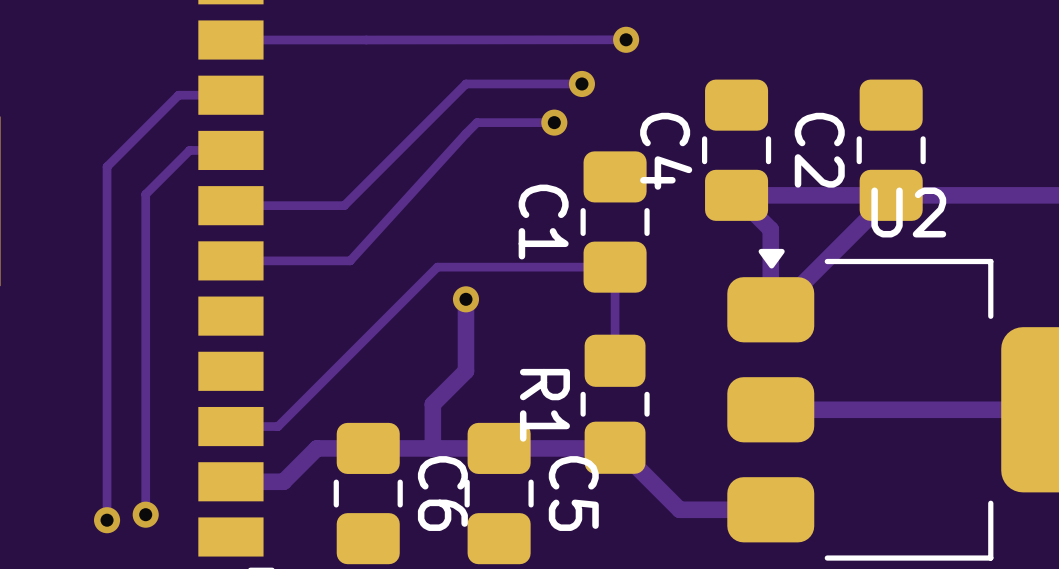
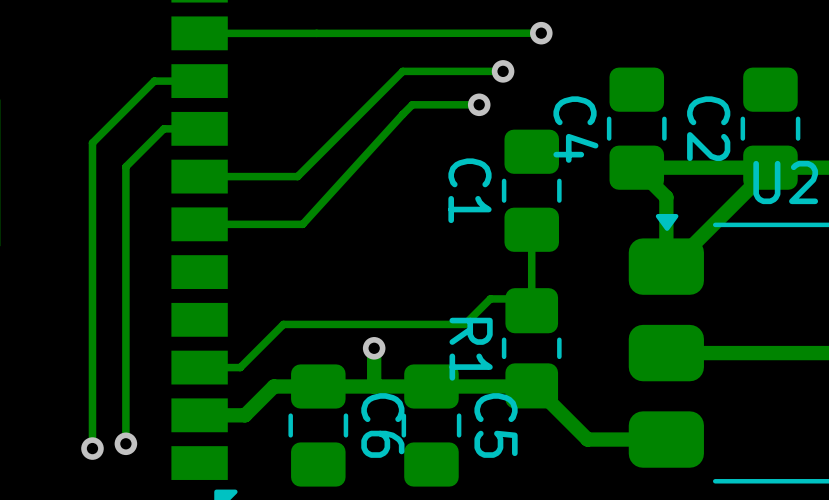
track: (615, 267) (437, 267) (327, 376) -> (519, 298) (490, 298) (464, 324) (283, 324)
track: (465, 299) (465, 371) (432, 404) -> none
via position: (465, 299) -> (374, 348)

